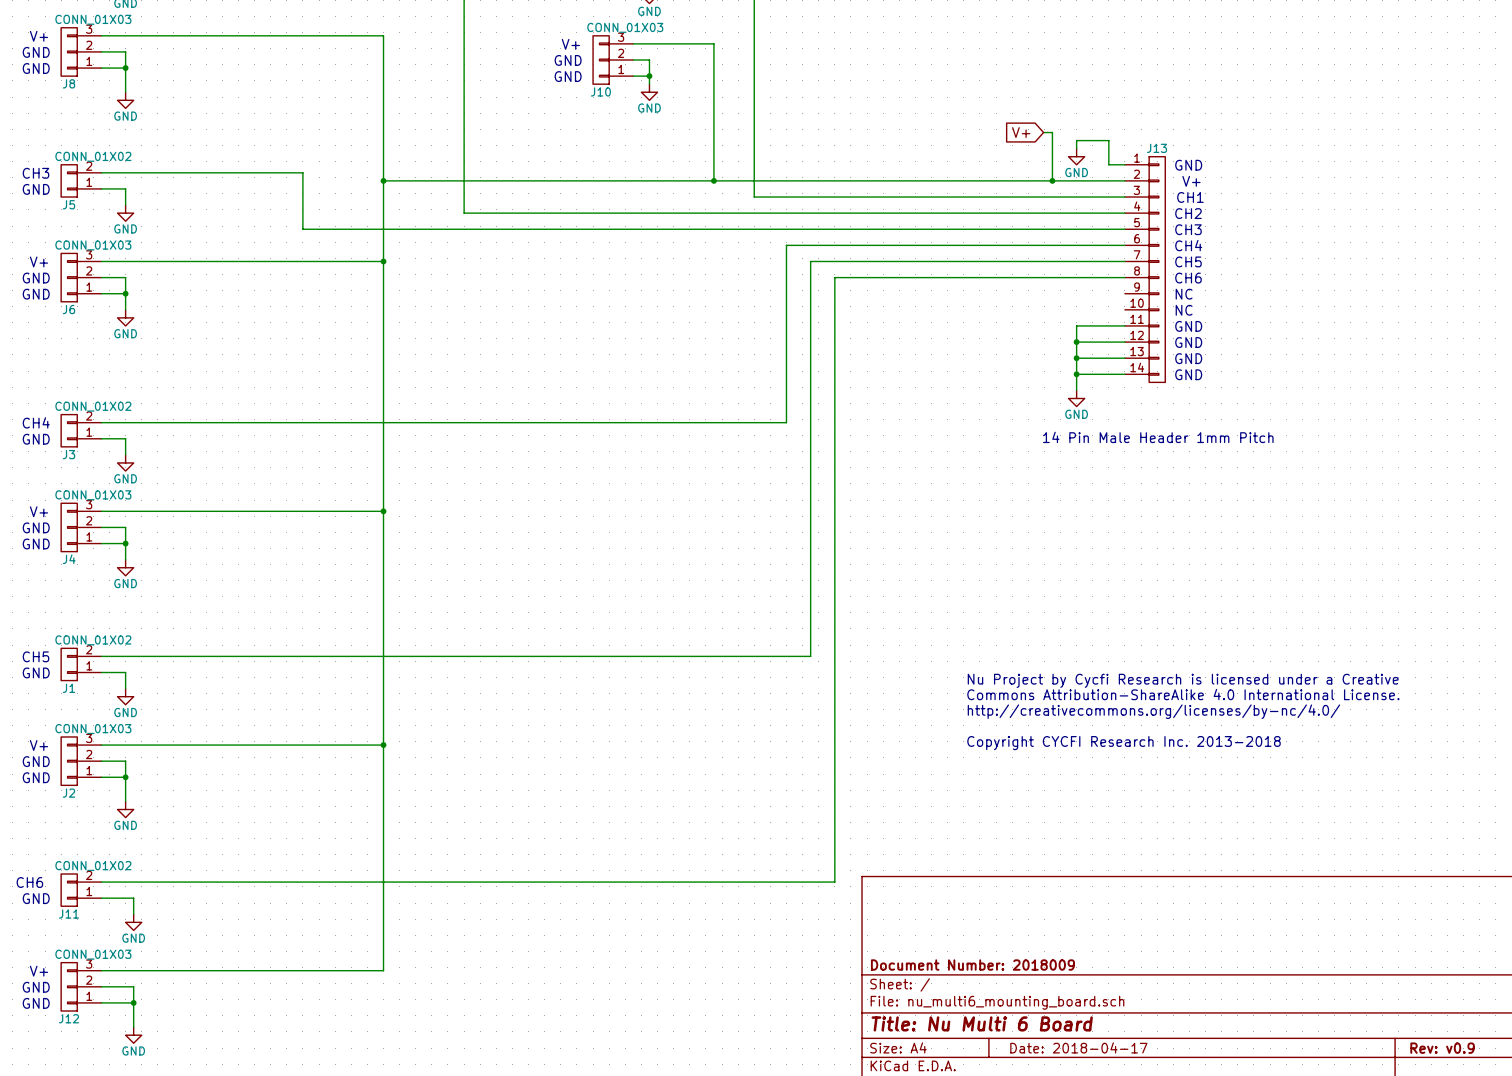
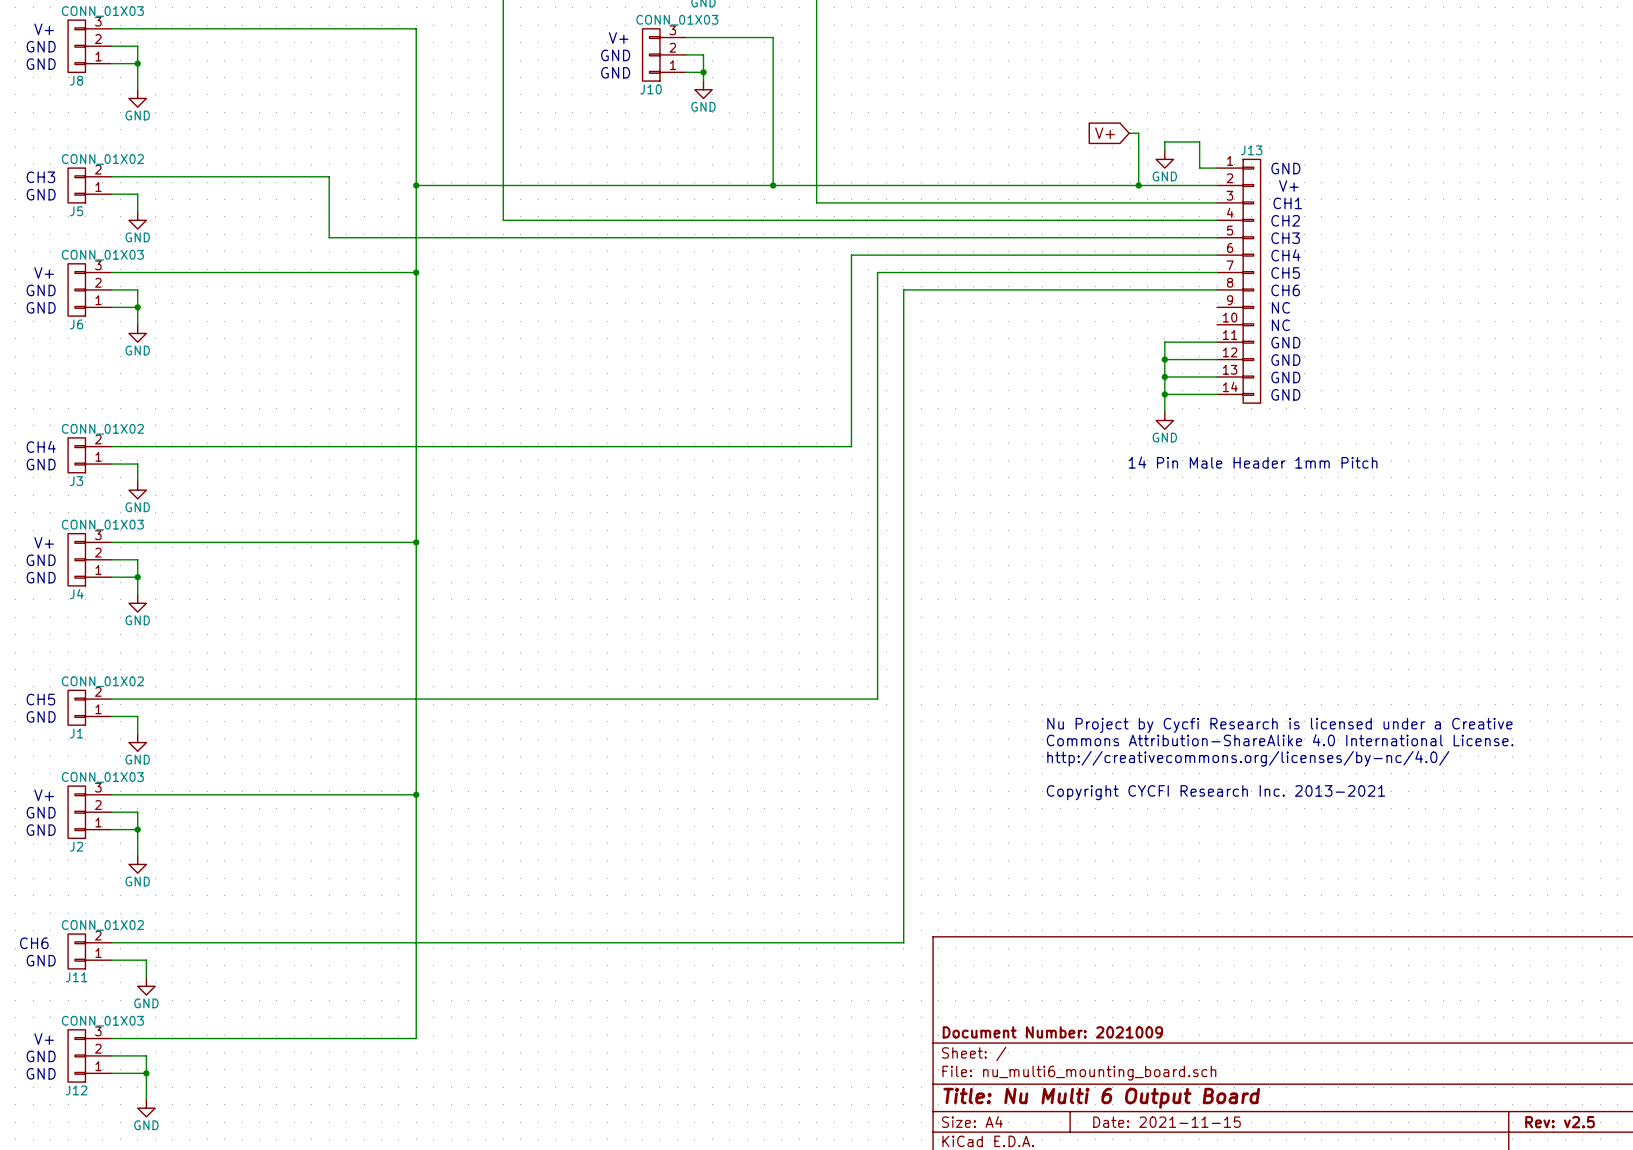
text: Copyright CYCFI Research Inc. 2013-2018 (1123, 743) -> Copyright CYCFI Research Inc. 2013-2021 (1215, 792)
title block: Document Number: 2018009 (972, 965) -> Document Number: 2021009 (1052, 1032)
title block: Title: Nu Multi 6 Board (982, 1023) -> Title: Nu Multi 6 Output Board (1101, 1098)
title block: Date: 2018-04-17 (1078, 1047) -> Date: 2021-11-15 (1167, 1122)
title block: Rev: v0.9 (1442, 1048) -> Rev: v2.5 (1560, 1122)

